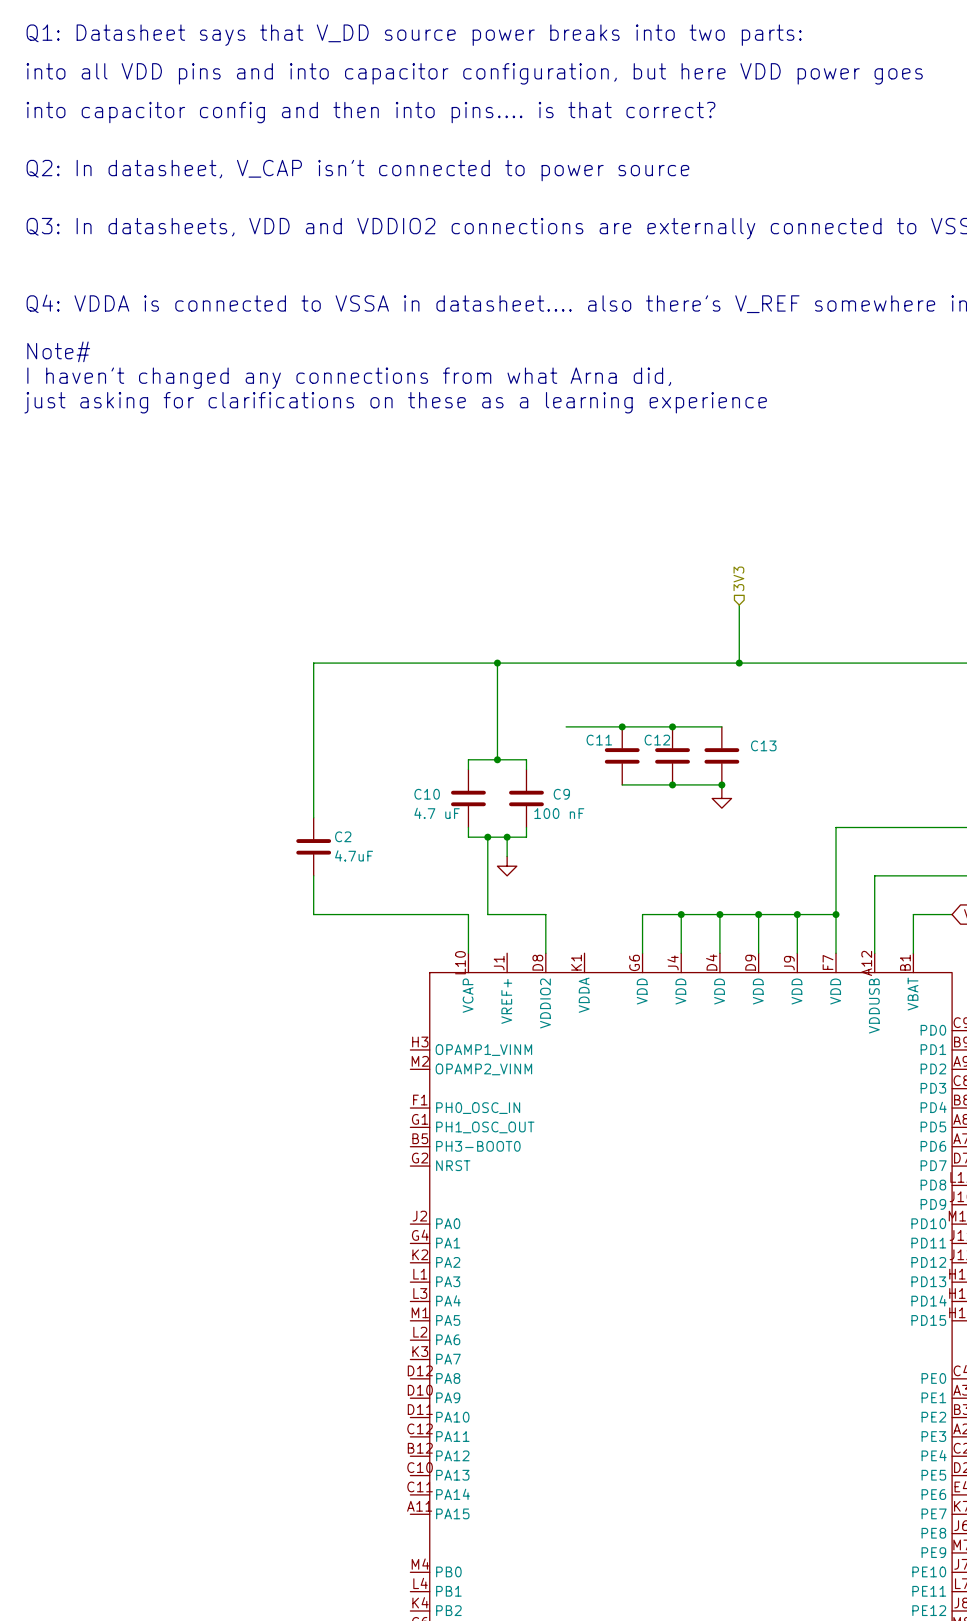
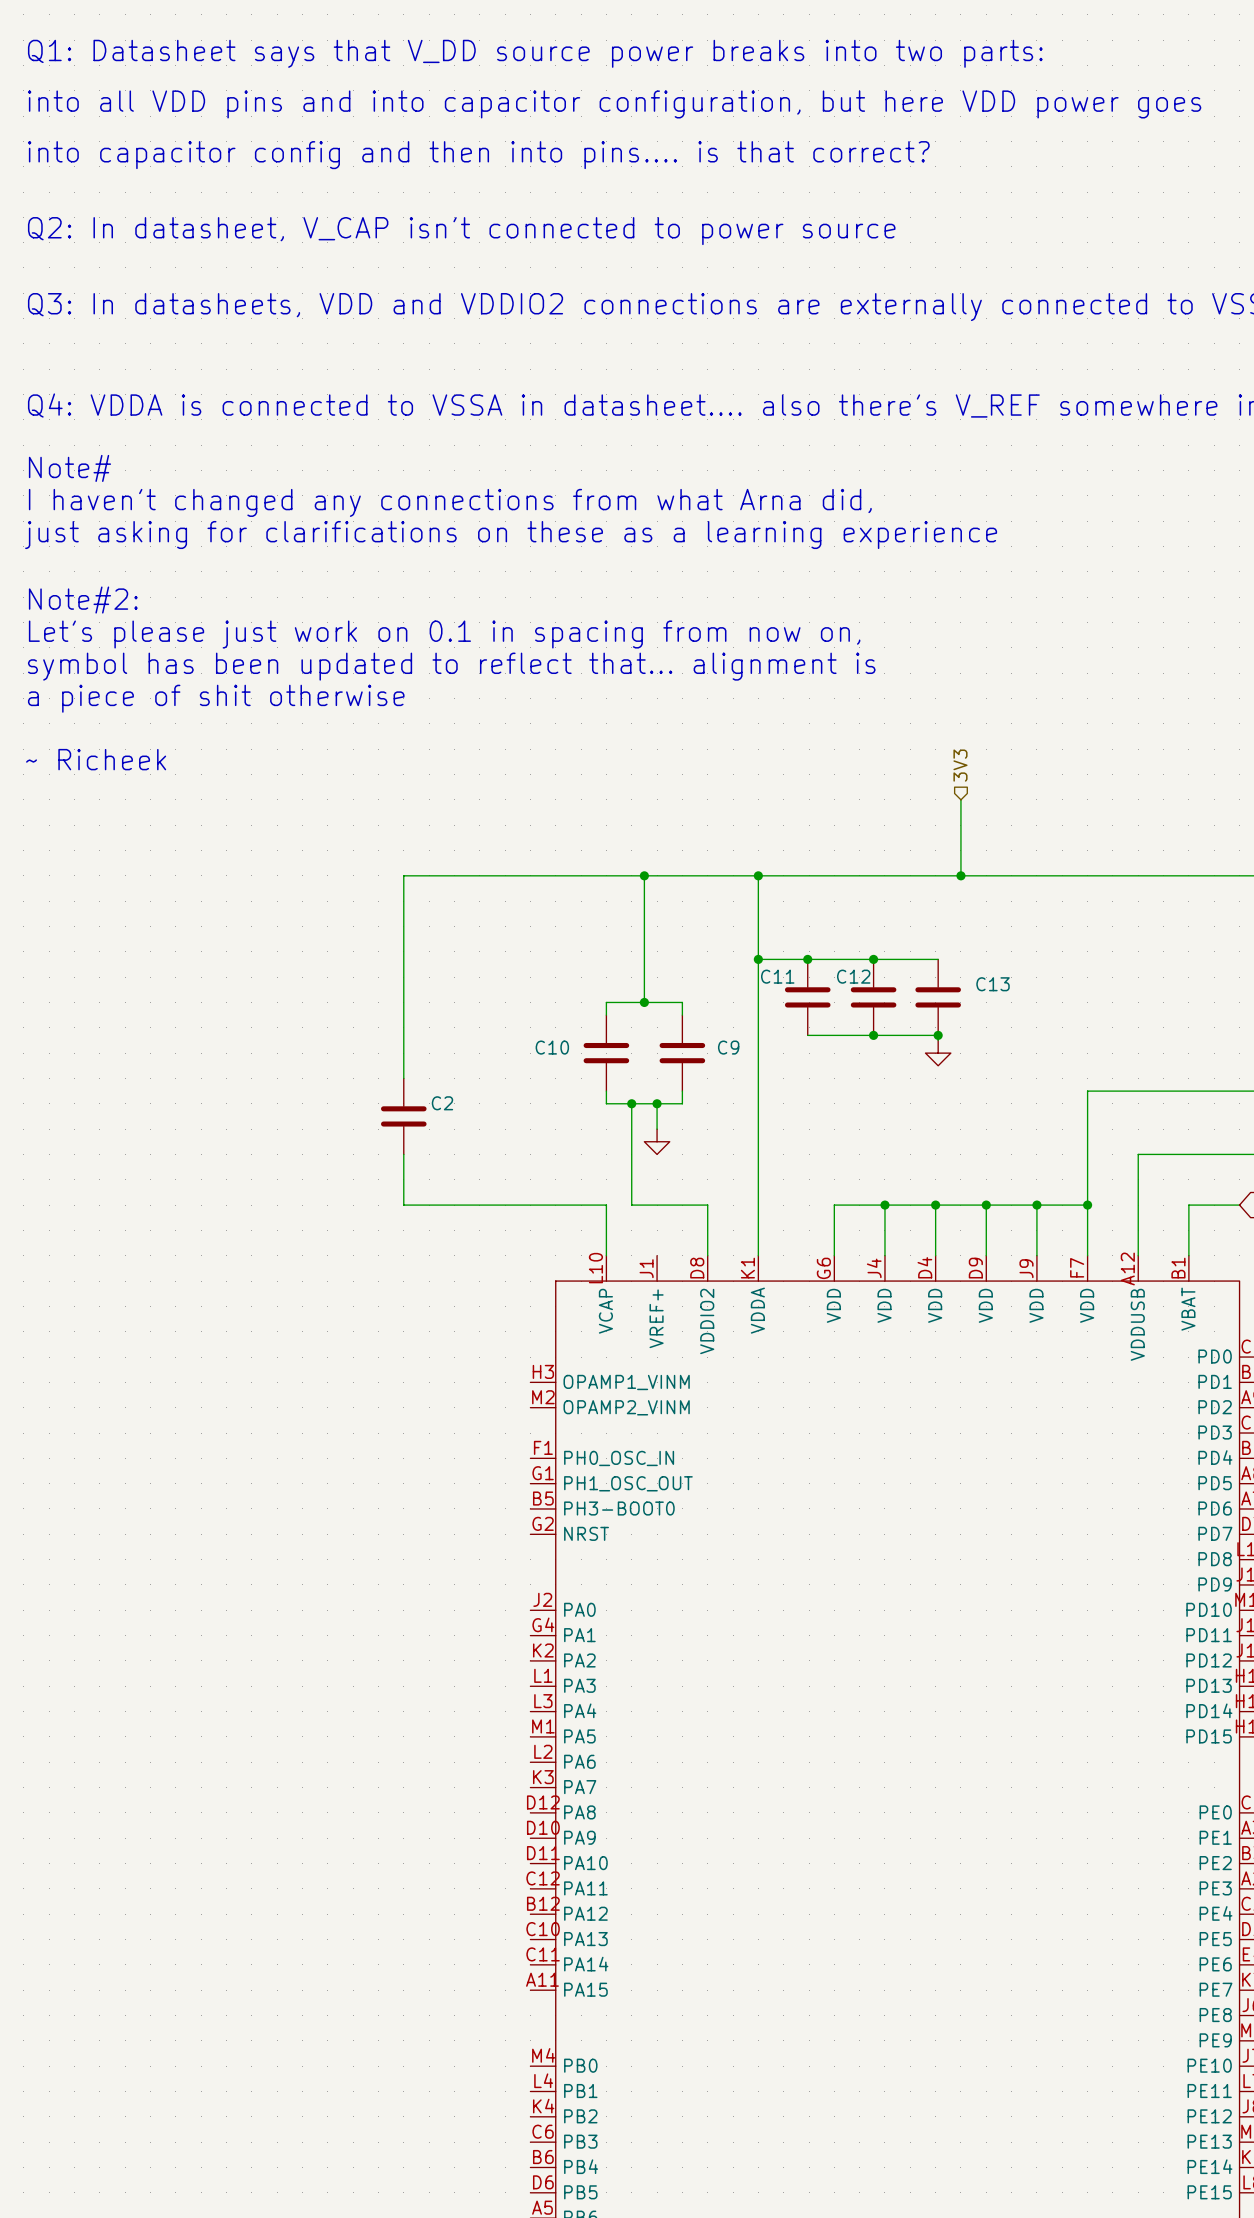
text: none -> Note#2: (83, 600)
text: none -> Let's please just work on 0.1 in spacing from now on, (444, 634)
text: none -> symbol has been updated to reflect that... alignment is (451, 666)
text: none -> a piece of shit otherwise (216, 698)
text: none -> ~ Richeek (96, 759)
wire: none -> (758, 875) (758, 1255)
junction: none -> (758, 875)
wire: (566, 726) (584, 726) -> none
junction: none -> (758, 959)
C10 value: 4.7 uF (437, 813) -> none
C9 value: 100 nF (559, 813) -> none
C2 value: 4.7uF (354, 855) -> none

